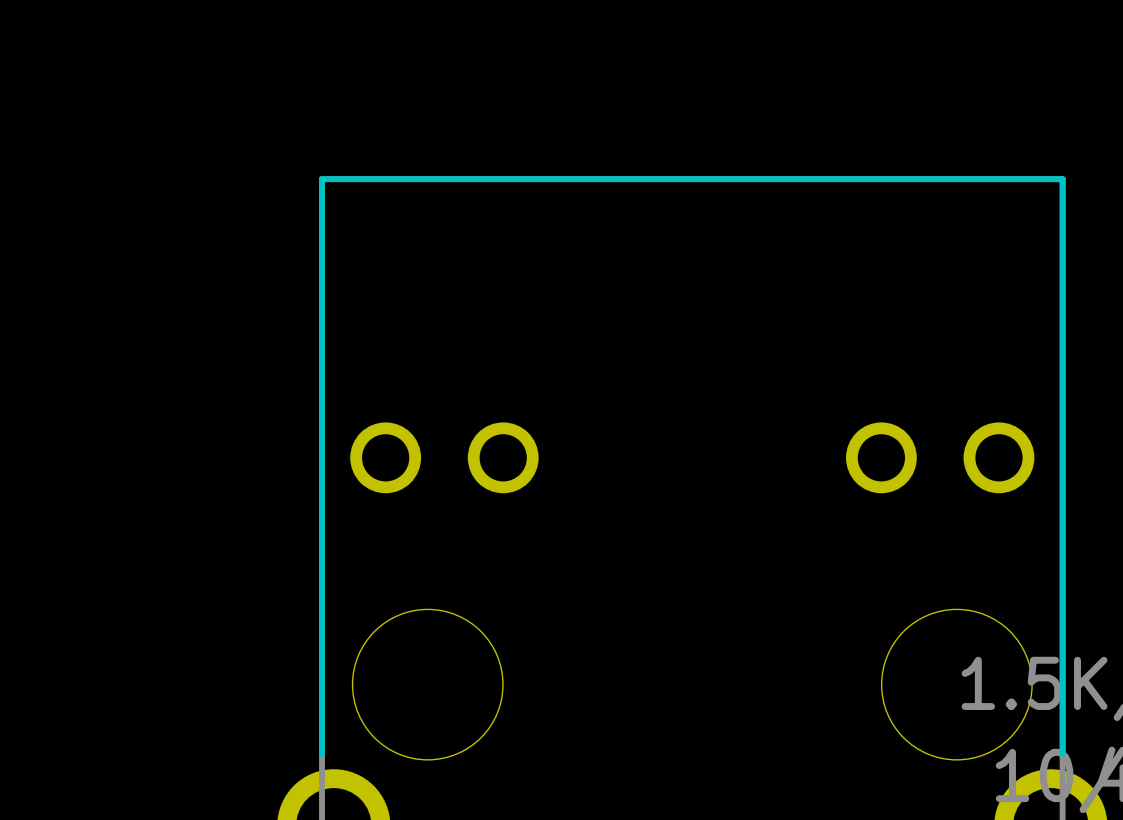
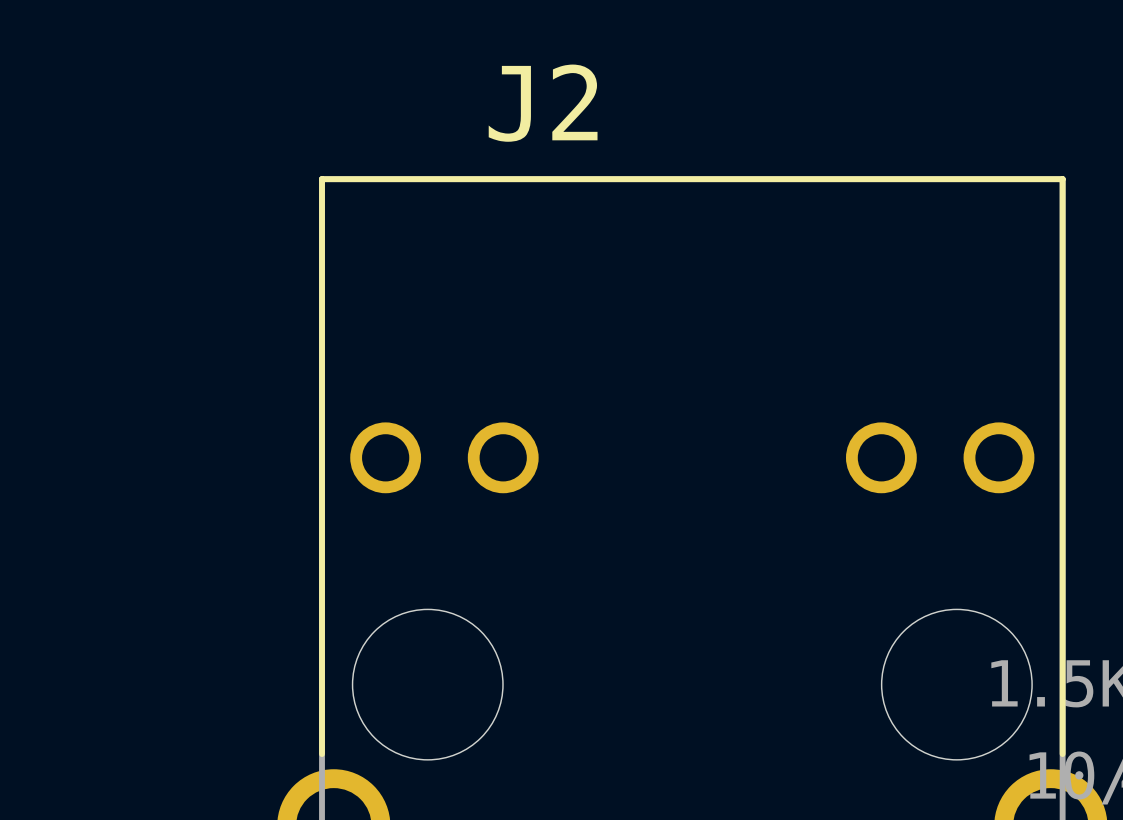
J2 name: none -> J2 (543, 103)

